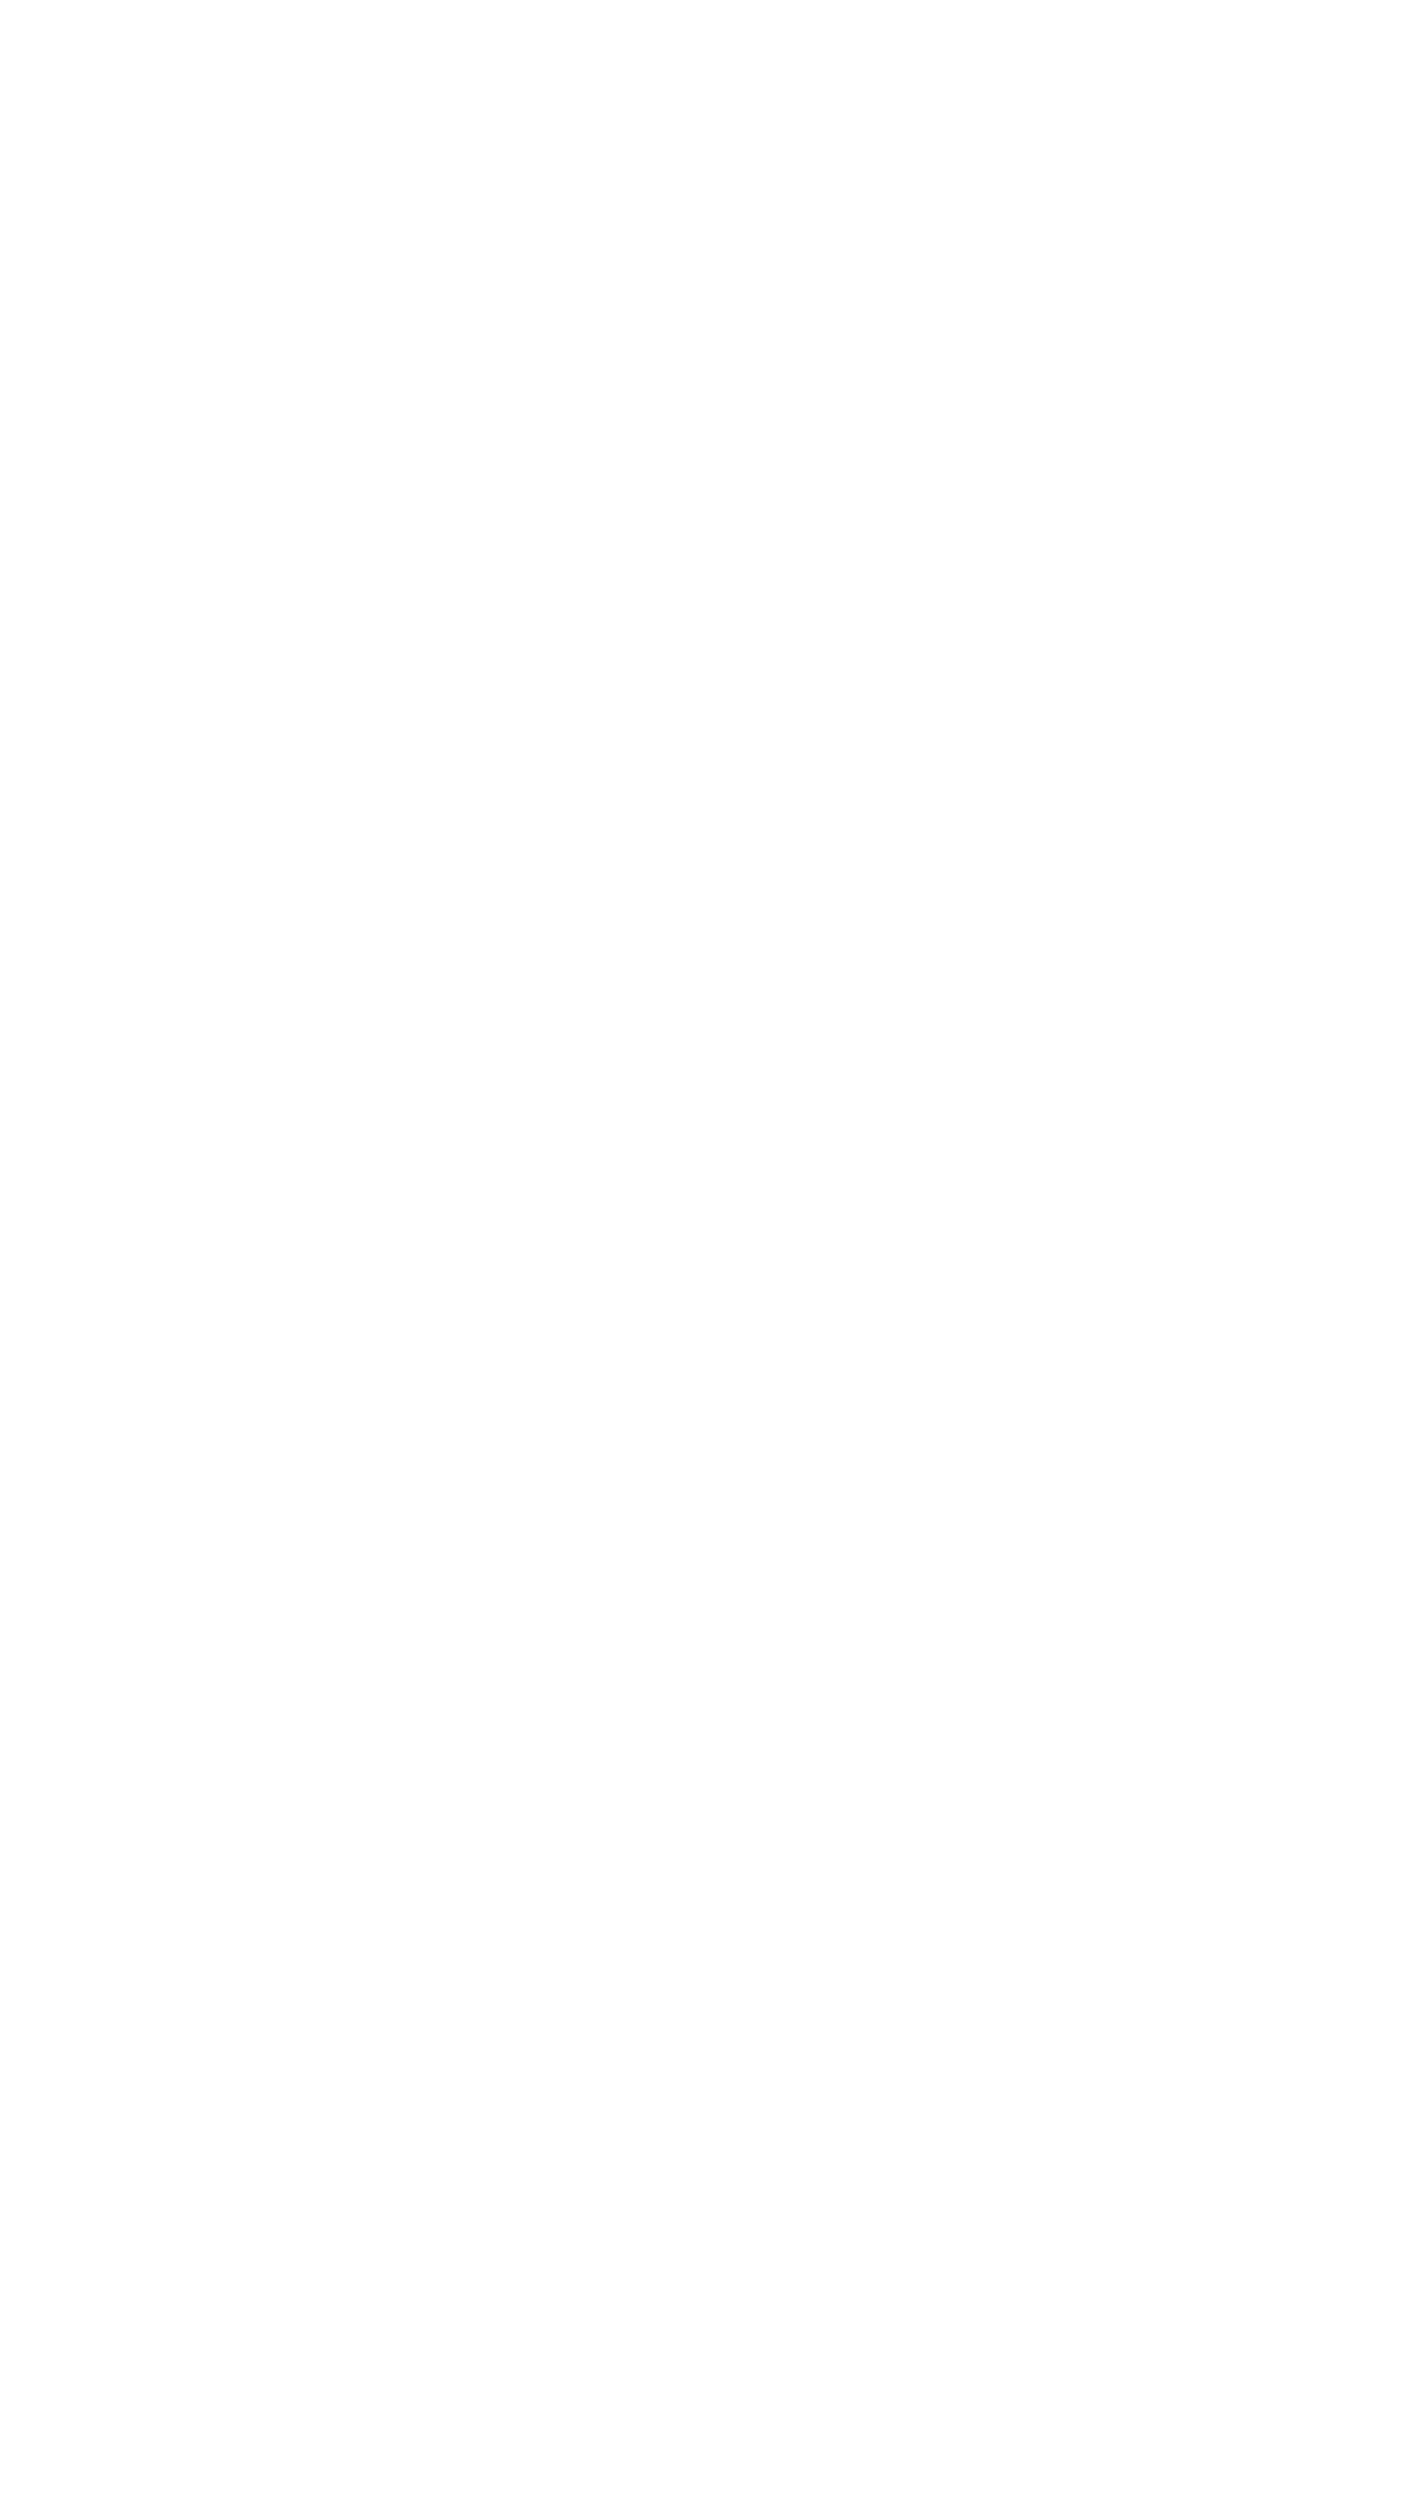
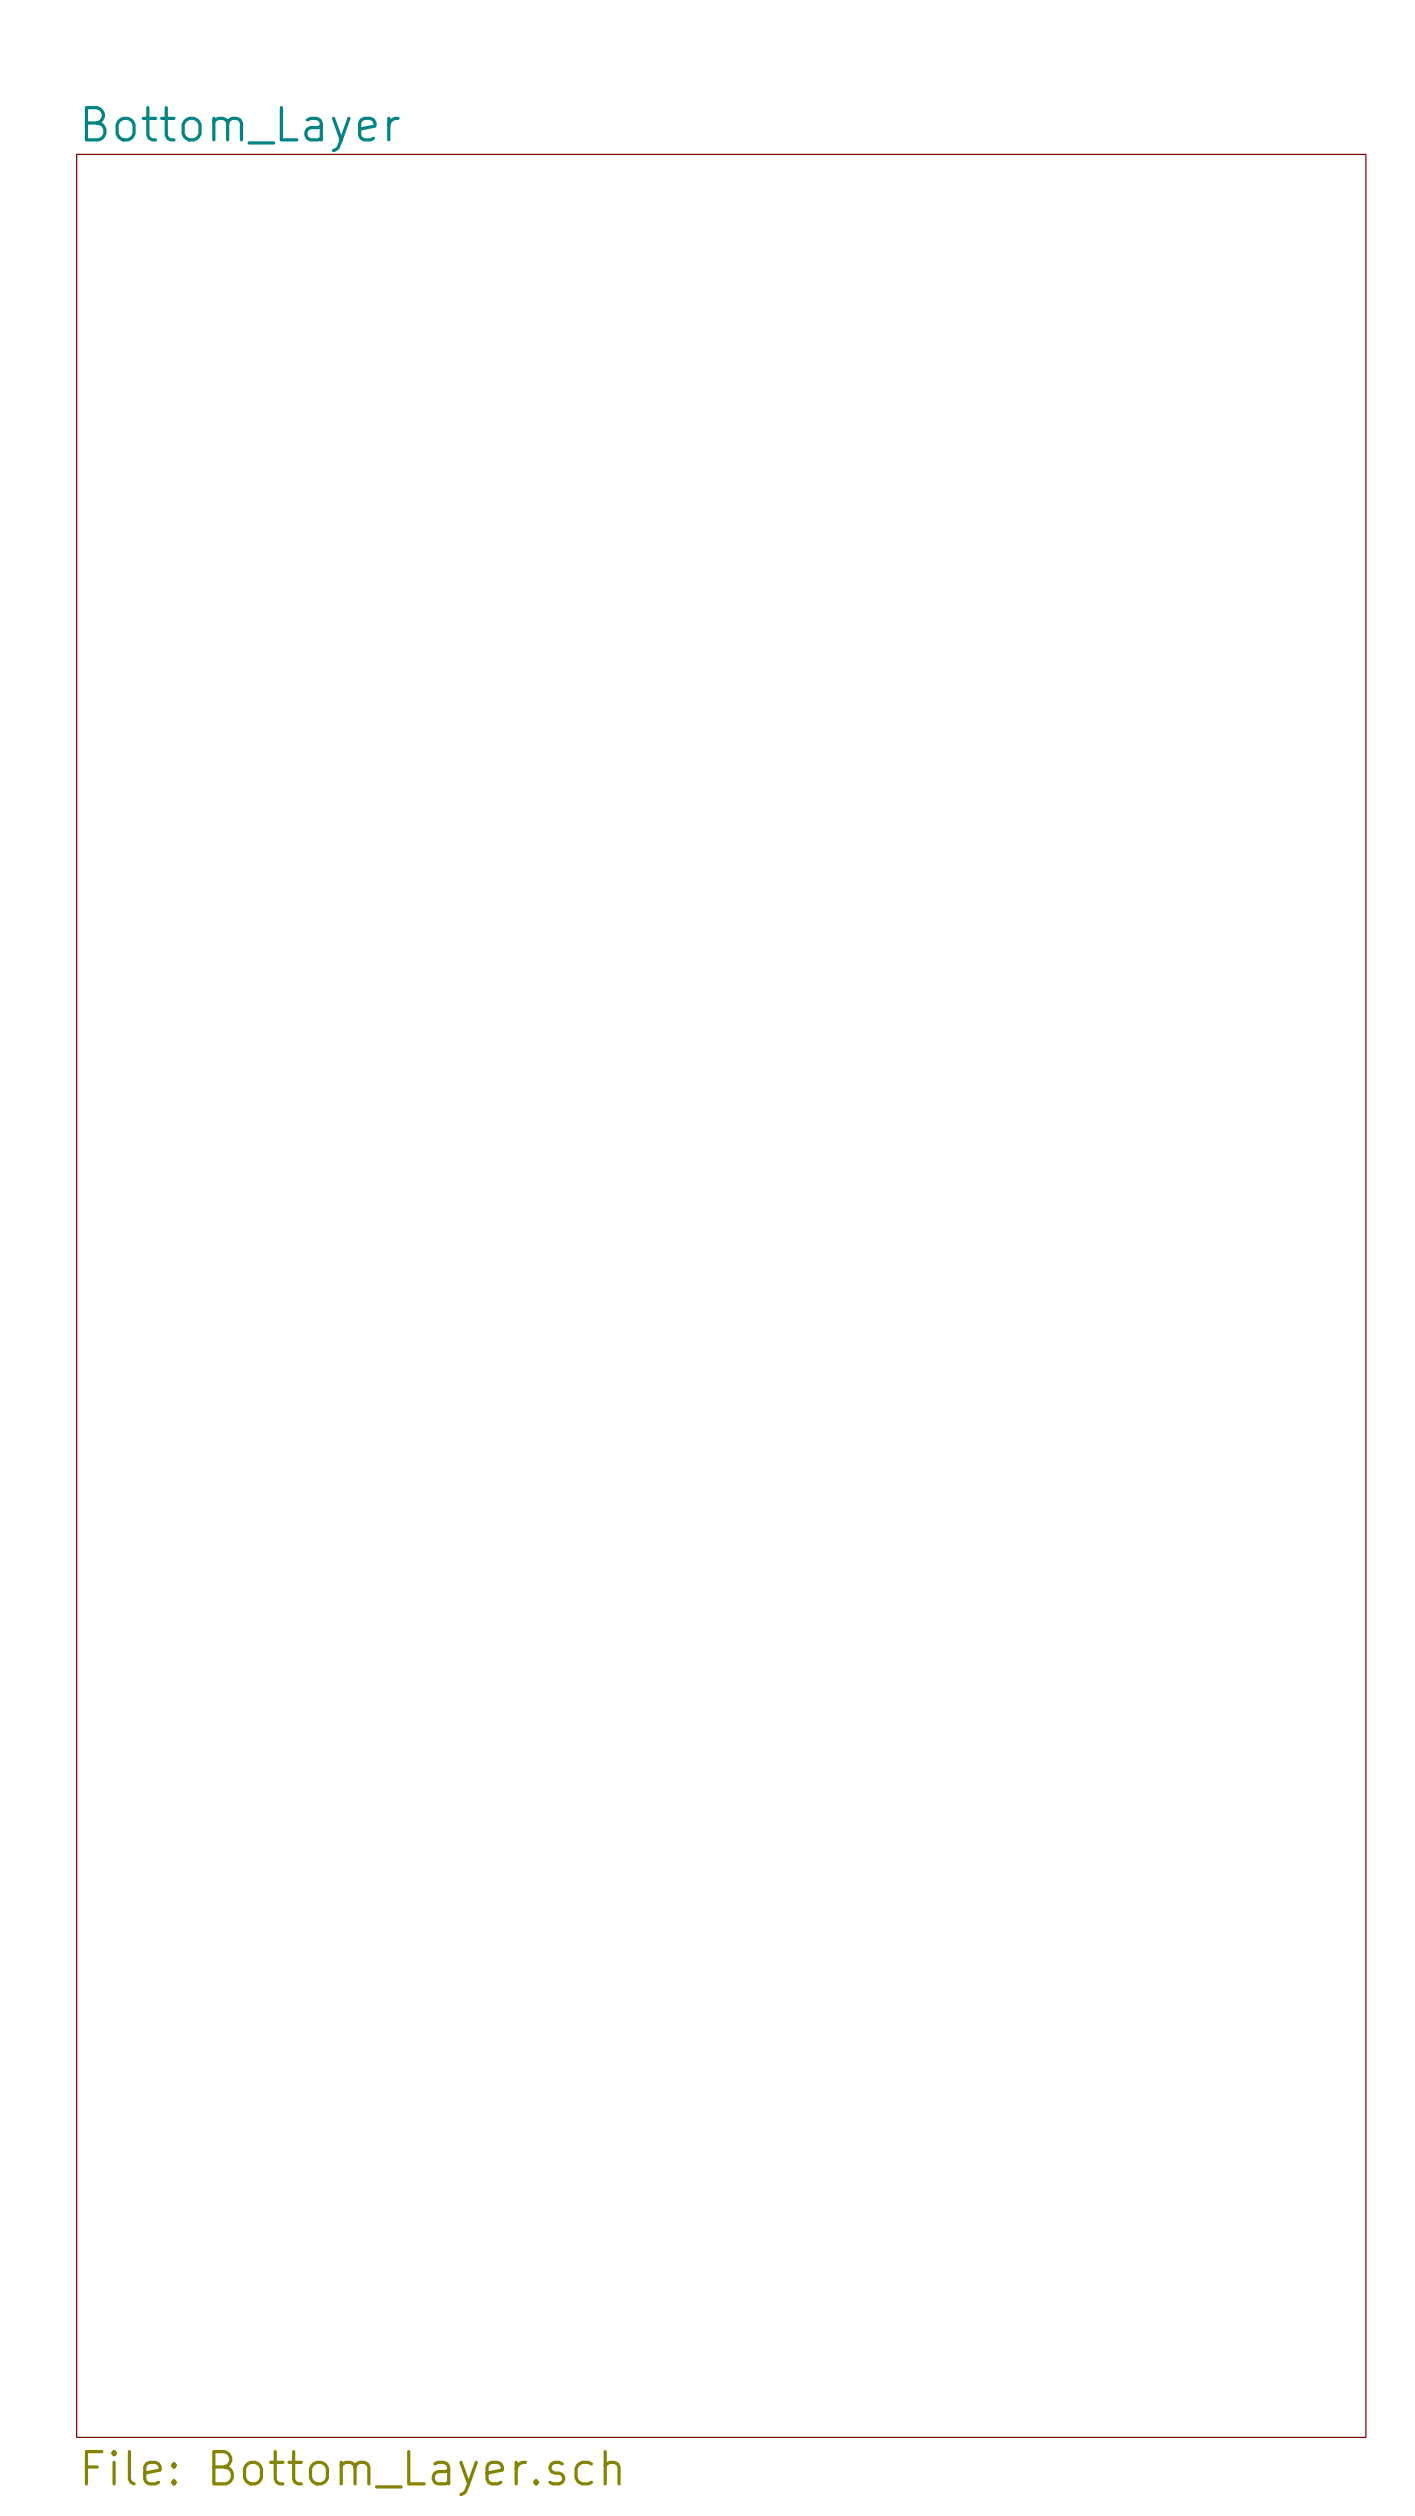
sheet Bottom_Layer: none -> File: Bottom_Layer.sch (721, 1295)

